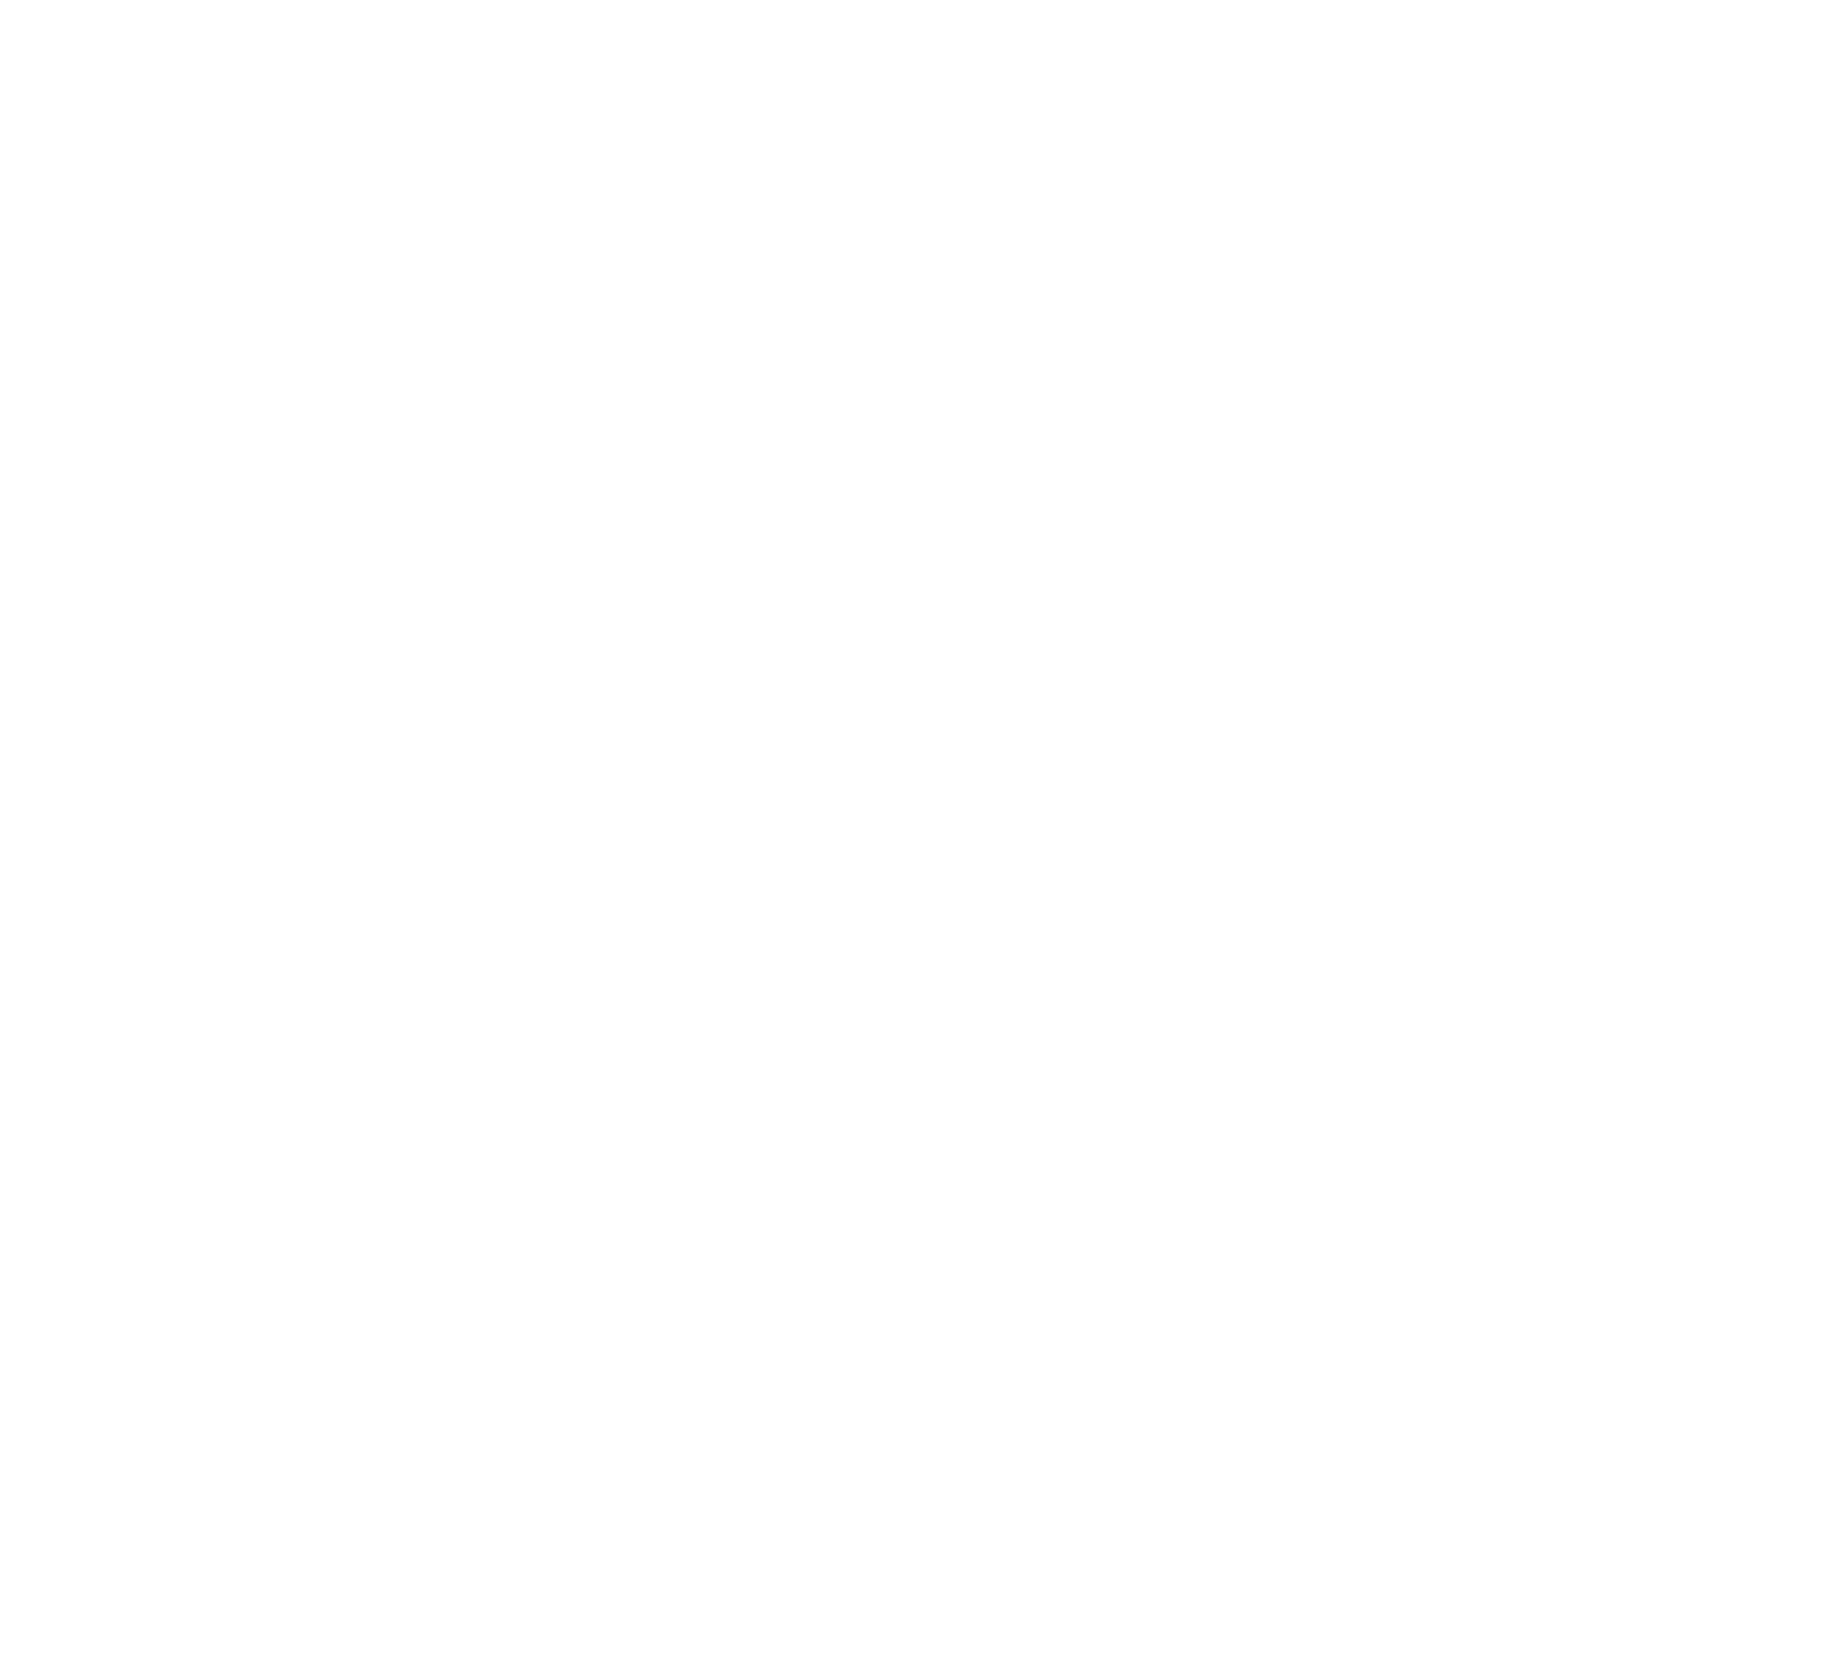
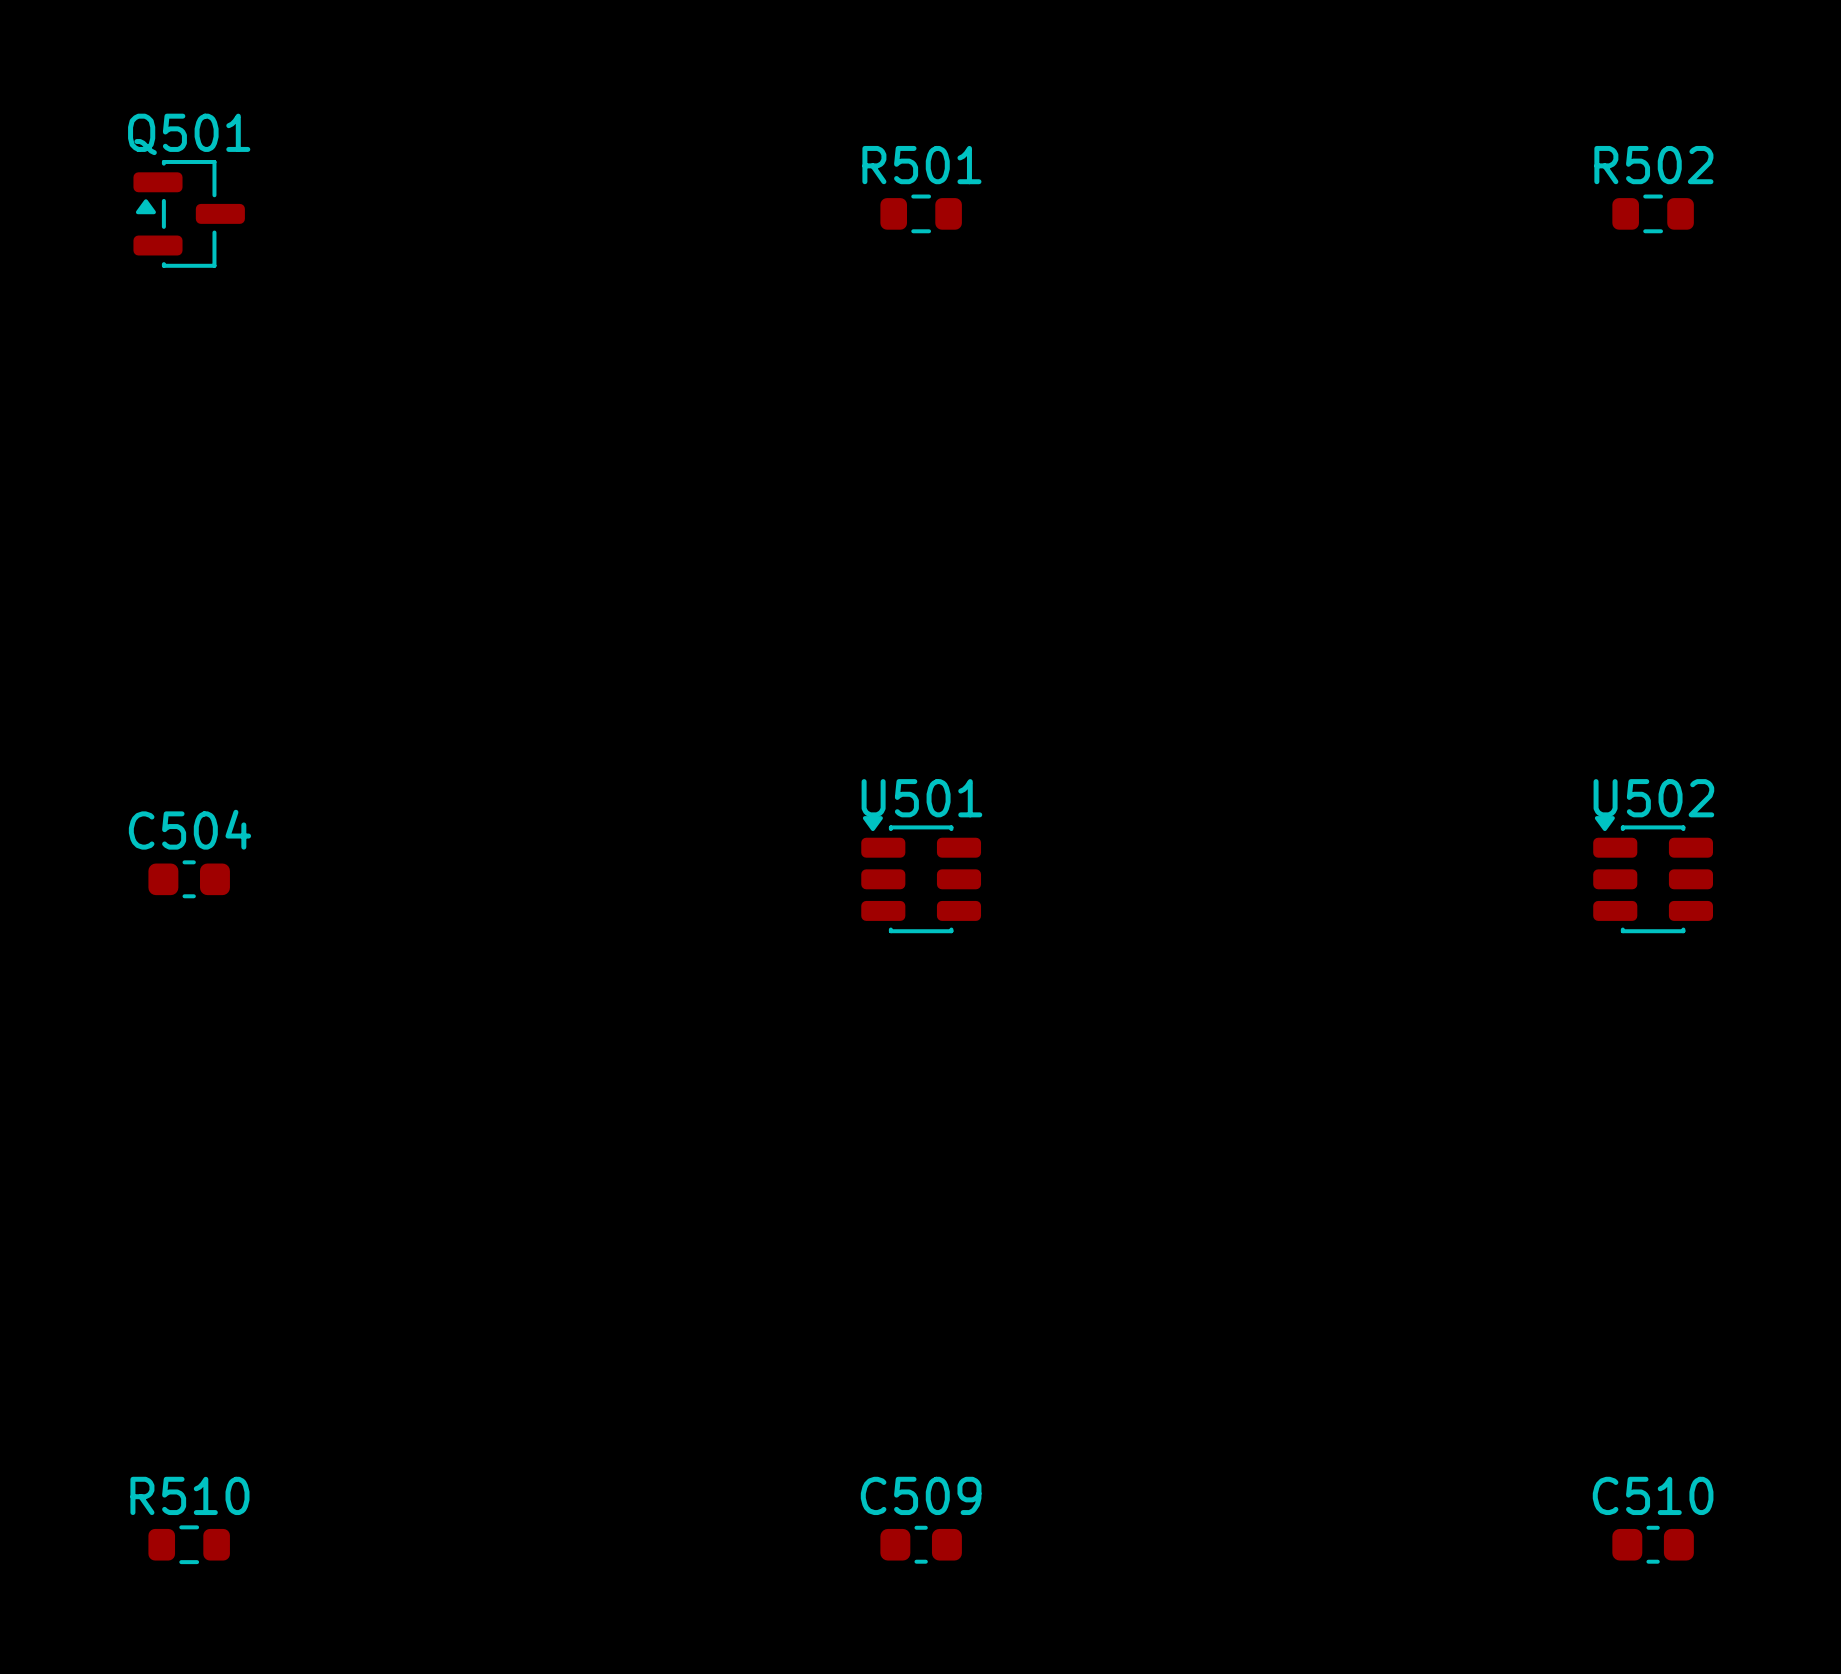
Q501: none -> (189, 213)
R501: none -> (921, 213)
R502: none -> (1653, 213)
U501: none -> (921, 874)
U502: none -> (1653, 874)
C504: none -> (189, 879)
R510: none -> (189, 1544)
C509: none -> (921, 1544)
C510: none -> (1653, 1544)

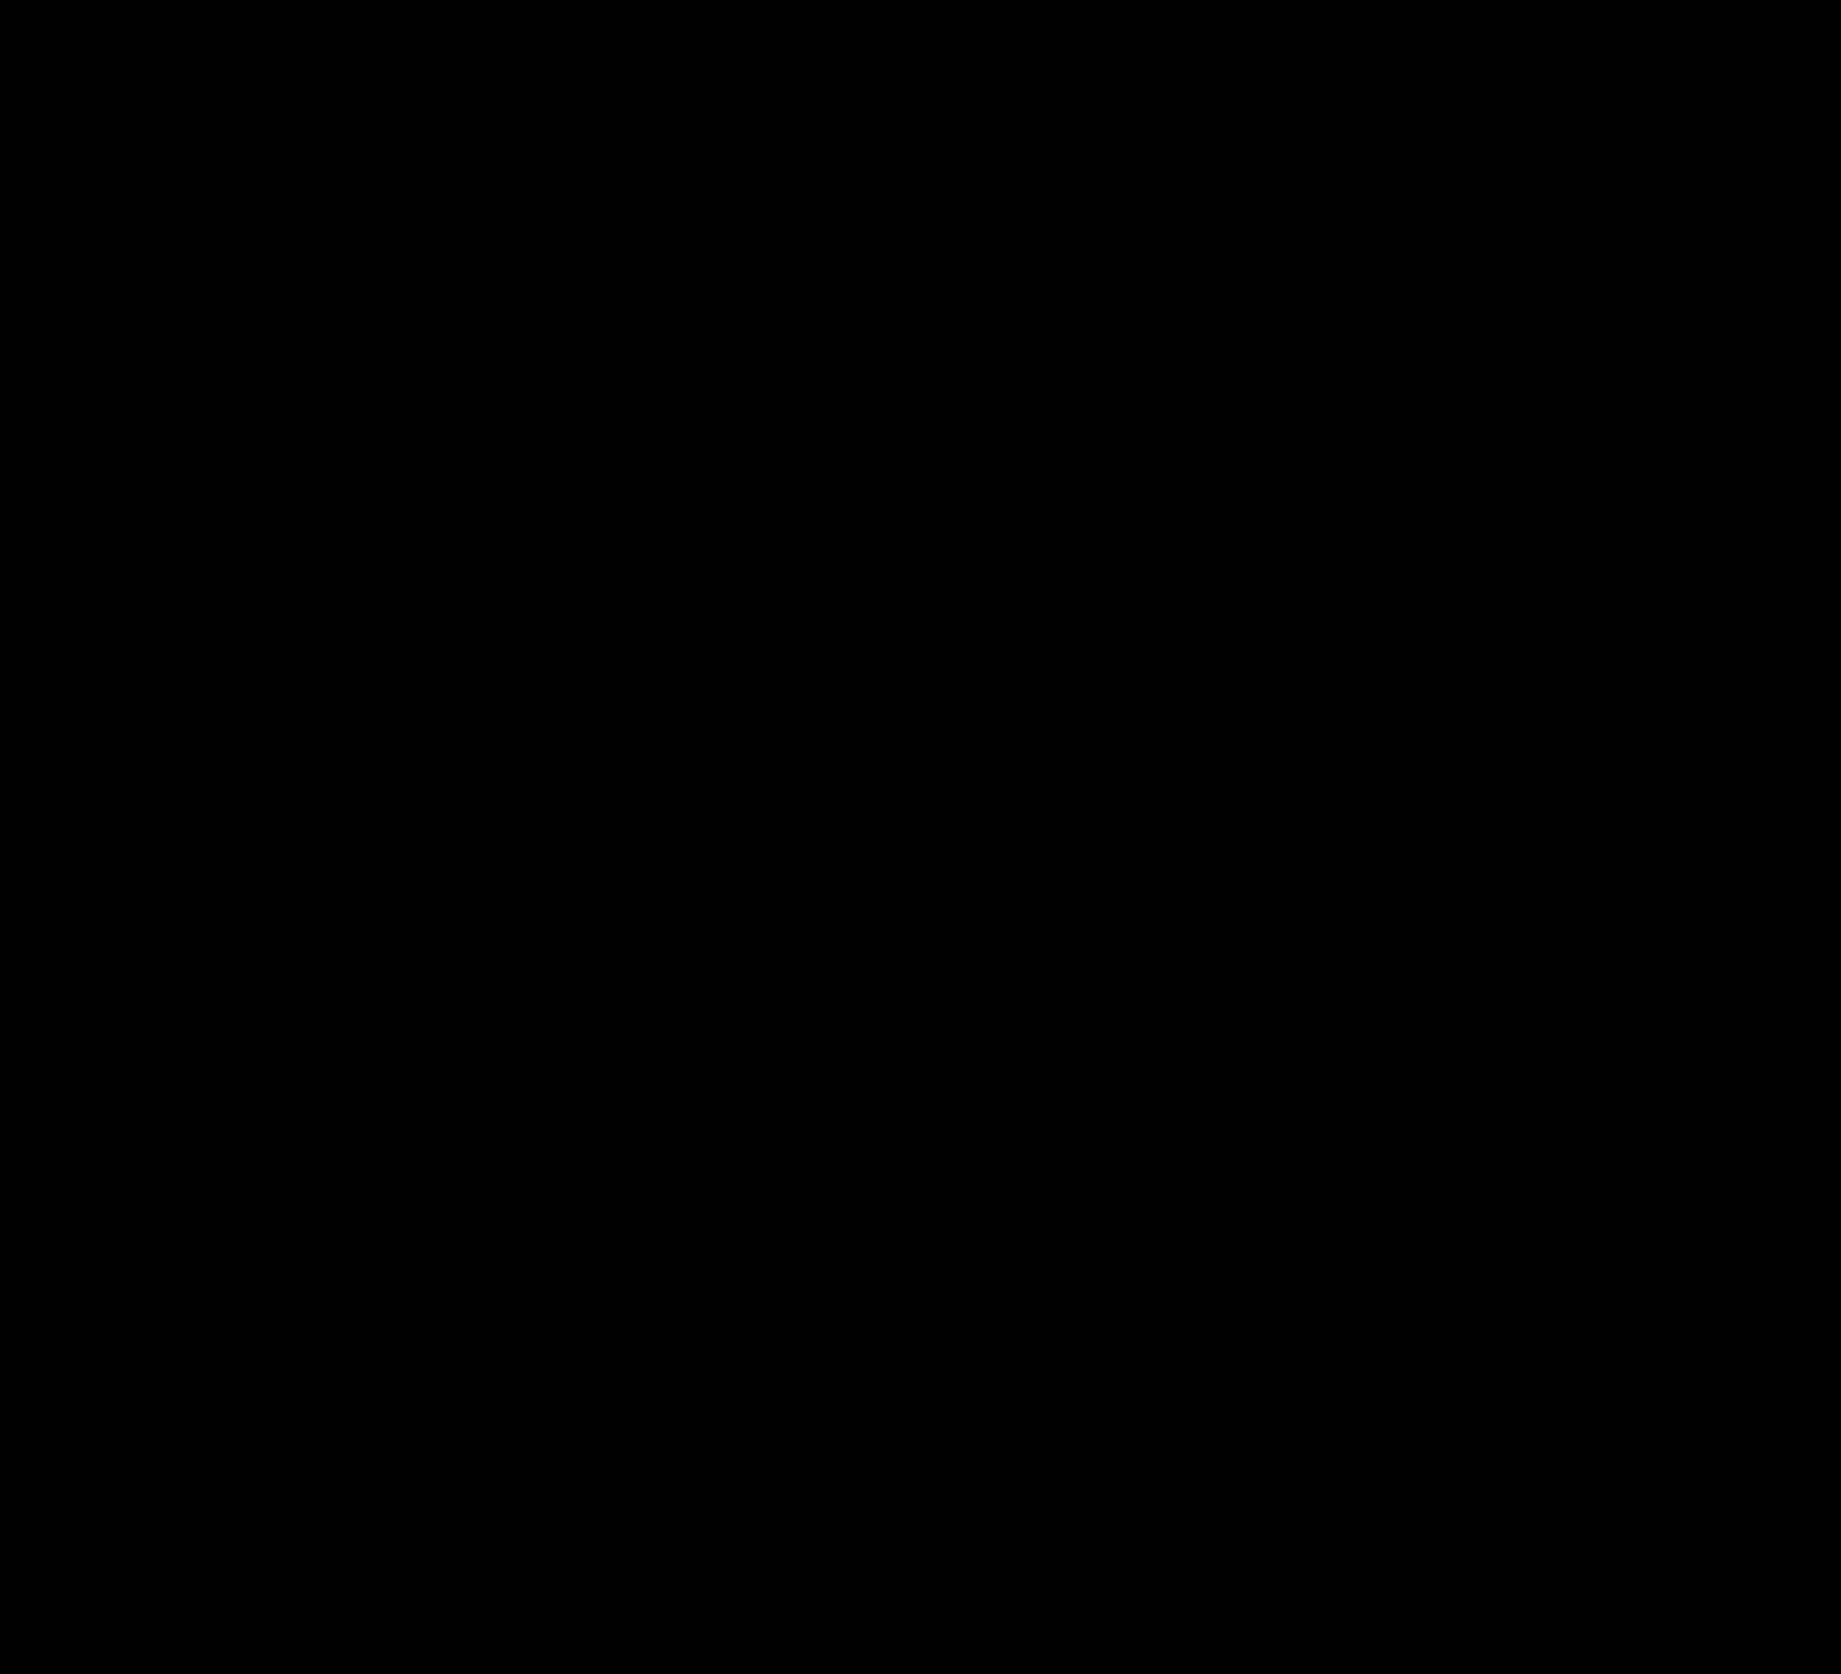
Q501: (189, 213) -> none
R501: (921, 213) -> none
R502: (1653, 213) -> none
U501: (921, 874) -> none
U502: (1653, 874) -> none
C504: (189, 879) -> none
R510: (189, 1544) -> none
C509: (921, 1544) -> none
C510: (1653, 1544) -> none

